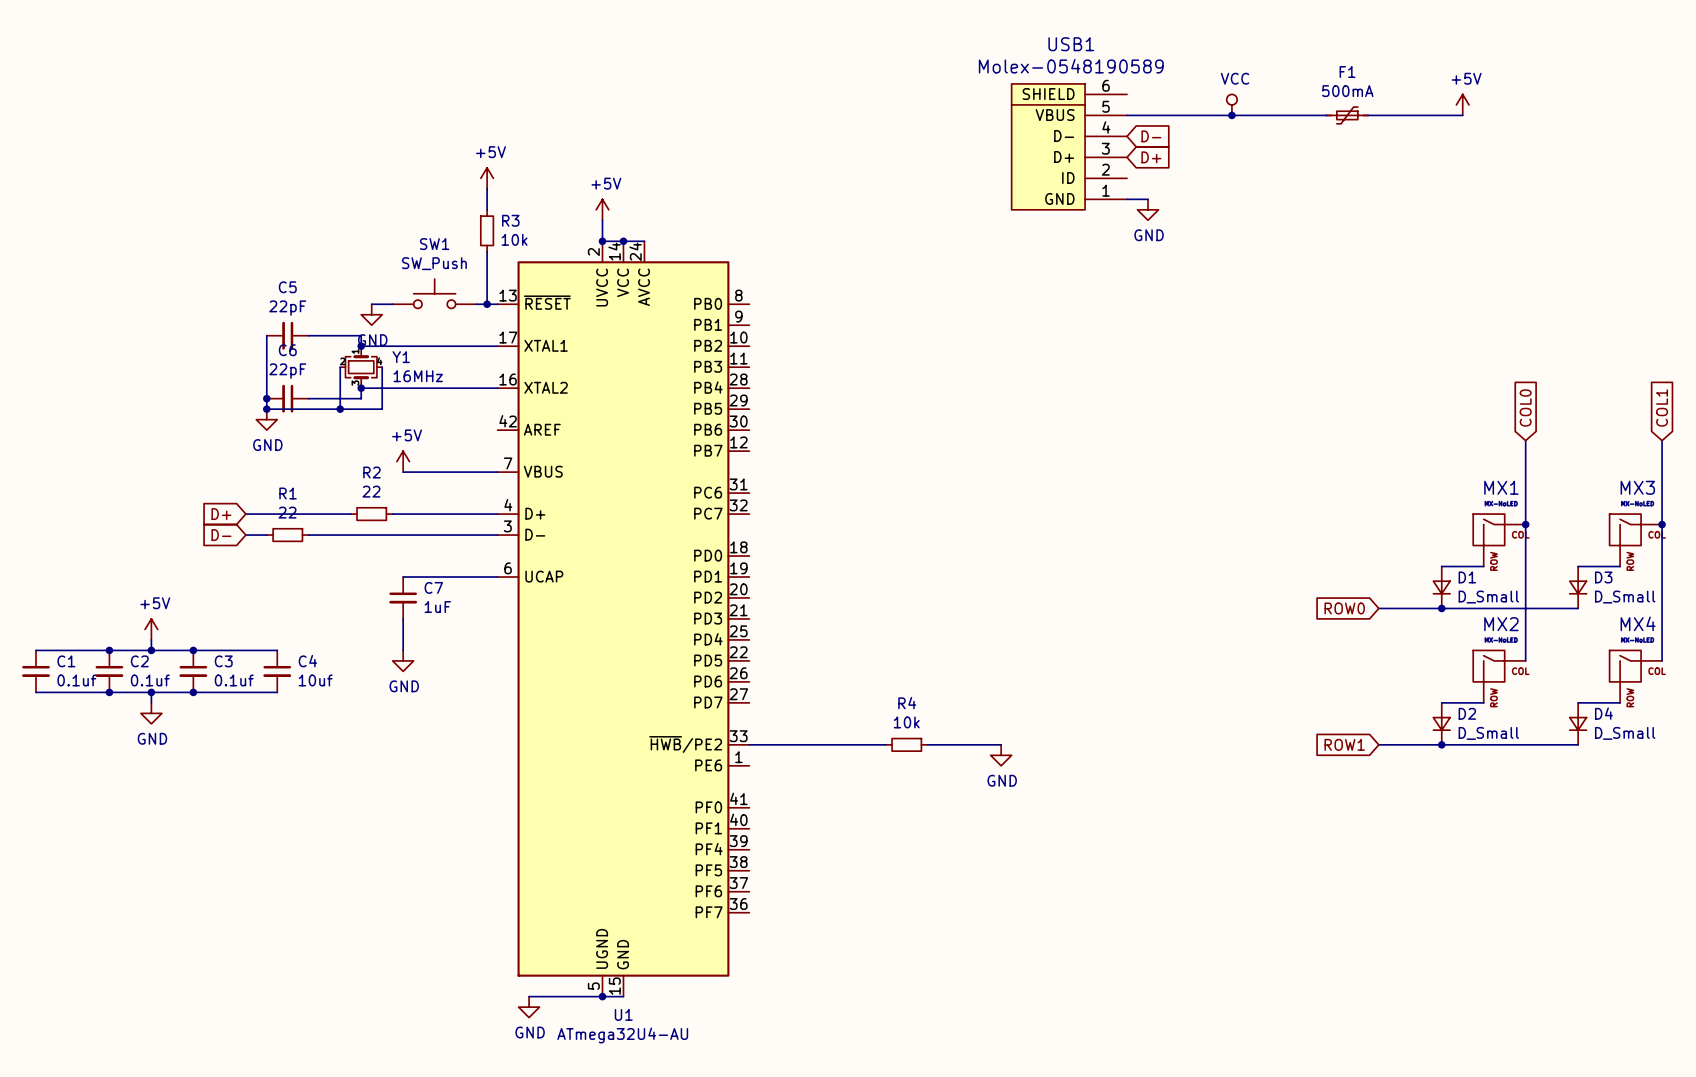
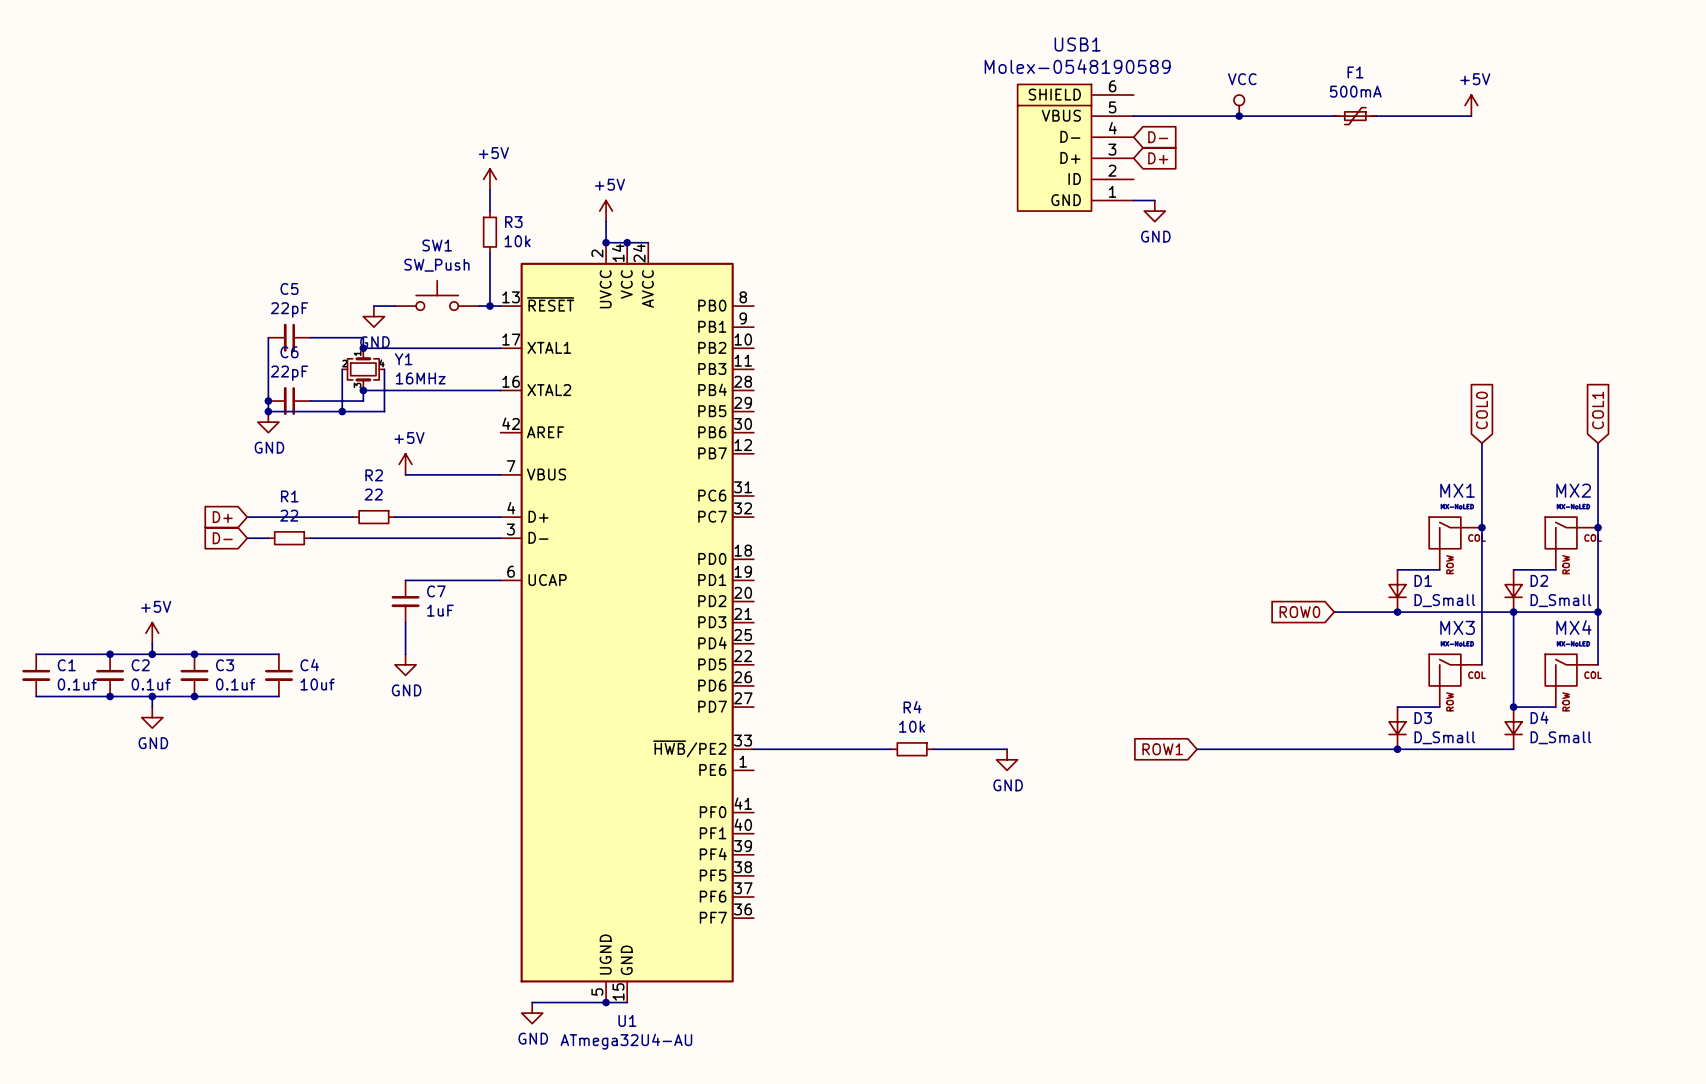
global label position: COL0 (1525, 408) -> COL0 (1481, 410)
global label position: COL1 (1662, 408) -> COL1 (1598, 410)
wire: (1525, 440) (1525, 660) -> (1481, 443) (1481, 664)
wire: (1662, 440) (1662, 660) -> (1598, 443) (1598, 664)
junction: none -> (1481, 527)
junction: (1525, 524) -> none
junction: none -> (1598, 527)
junction: (1662, 524) -> none
MX1 position: (1499, 540) -> (1455, 543)
MX3 position: (1635, 540) -> (1455, 680)
wire: (1441, 566) (1483, 566) -> (1397, 569) (1439, 569)
wire: (1578, 566) (1620, 566) -> (1513, 569) (1555, 569)
D1 position: (1441, 587) -> (1397, 590)
D3 position: (1578, 587) -> (1397, 728)
wire: none -> (1334, 612) (1386, 612)
global label position: ROW0 (1344, 608) -> ROW0 (1299, 612)
junction: none -> (1397, 612)
junction: (1441, 608) -> none
wire: none -> (1513, 612) (1513, 707) (1555, 707)
junction: none -> (1513, 612)
wire: none -> (1587, 612) (1598, 612)
junction: none -> (1598, 612)
MX2 position: (1499, 676) -> (1571, 543)
MX4 position: (1635, 676) -> (1571, 680)
wire: (1441, 702) (1483, 702) -> (1397, 707) (1439, 707)
junction: none -> (1513, 707)
wire: (1578, 702) (1620, 702) -> none
D2 position: (1441, 723) -> (1513, 590)
D4 position: (1578, 723) -> (1513, 728)
wire: none -> (1197, 749) (1386, 749)
global label position: ROW1 (1344, 744) -> ROW1 (1162, 749)
junction: none -> (1397, 749)
junction: (1441, 744) -> none
wire: (1504, 744) (1578, 744) -> none

